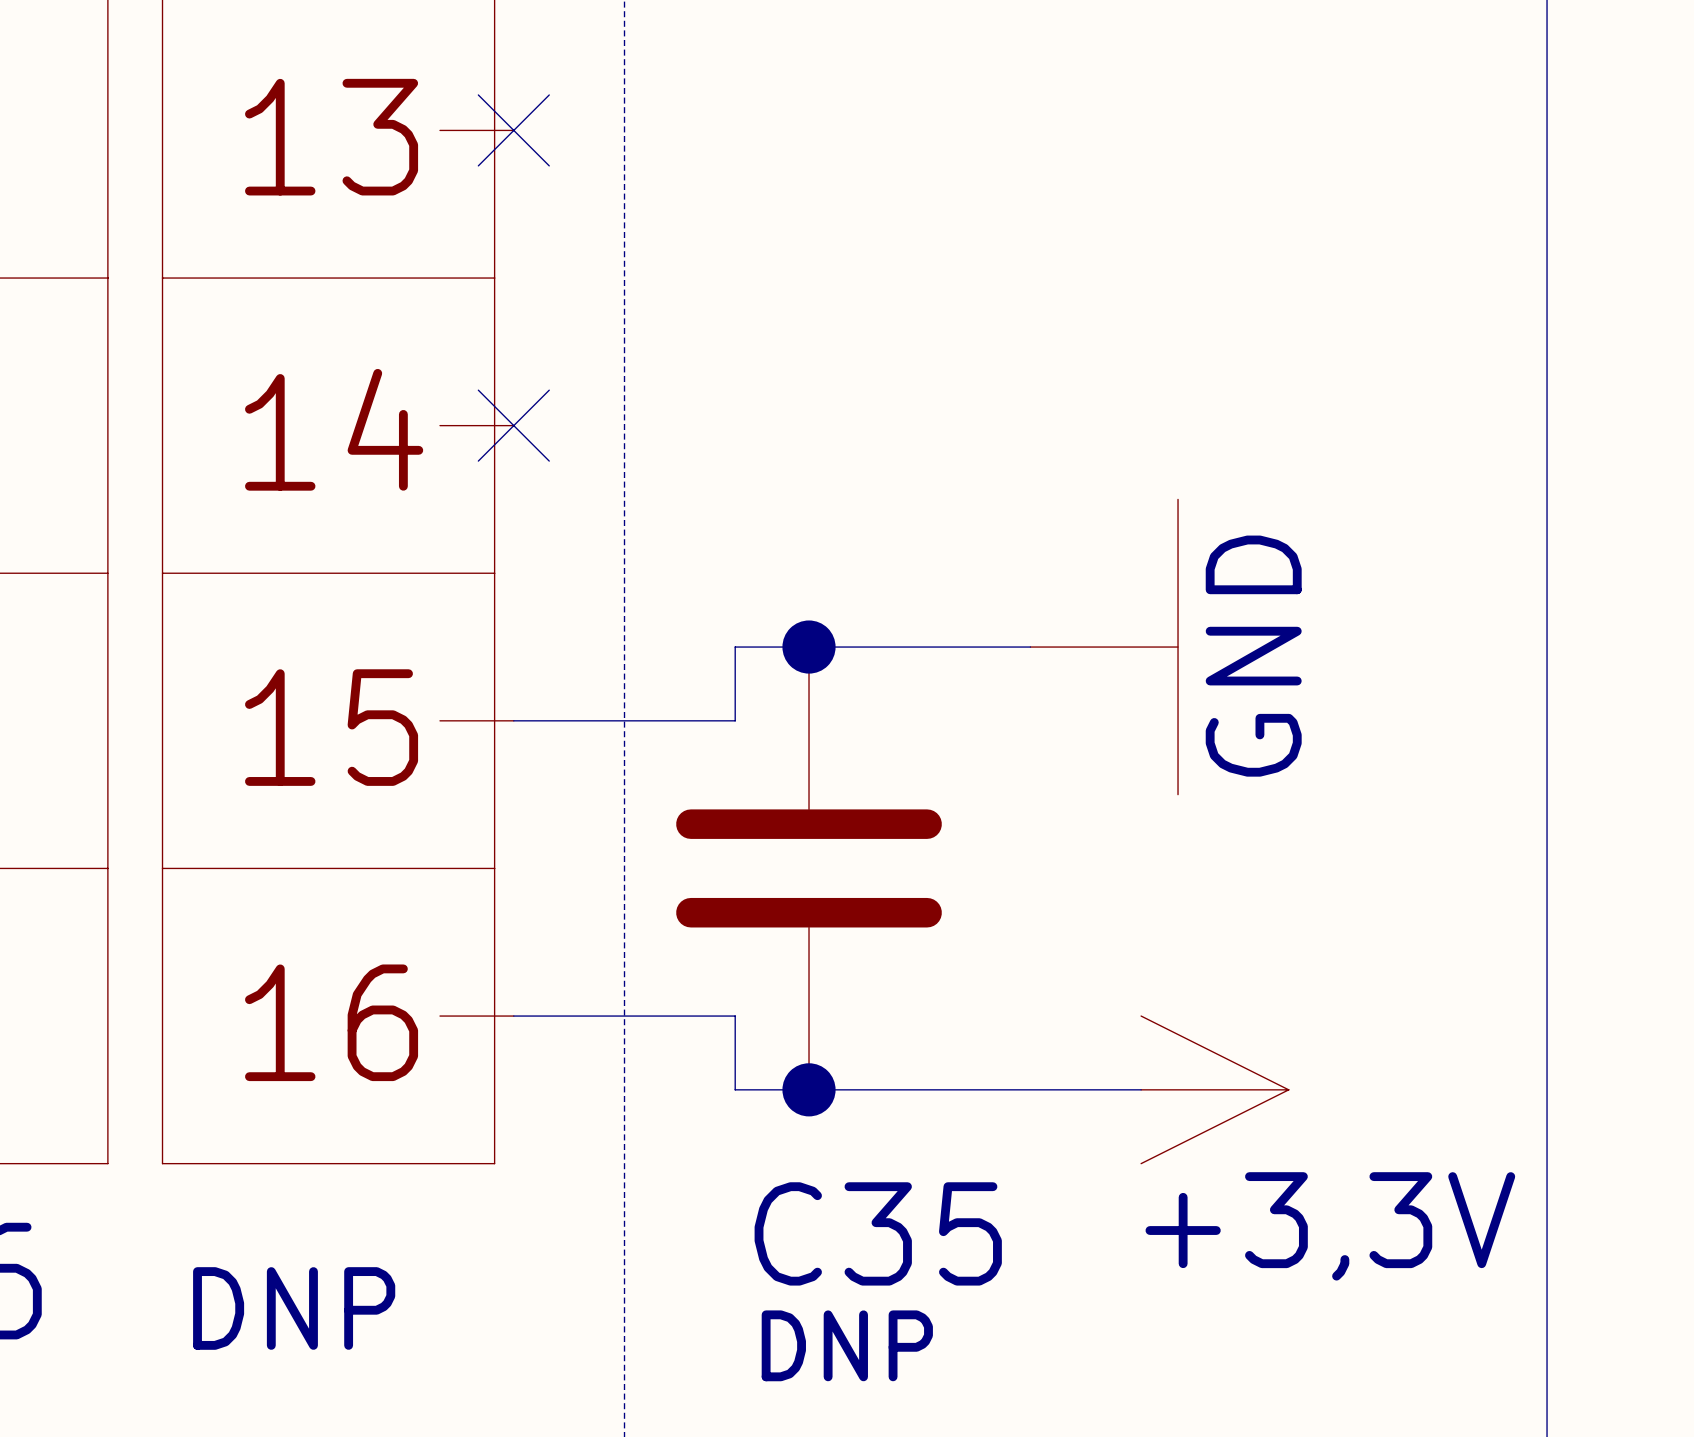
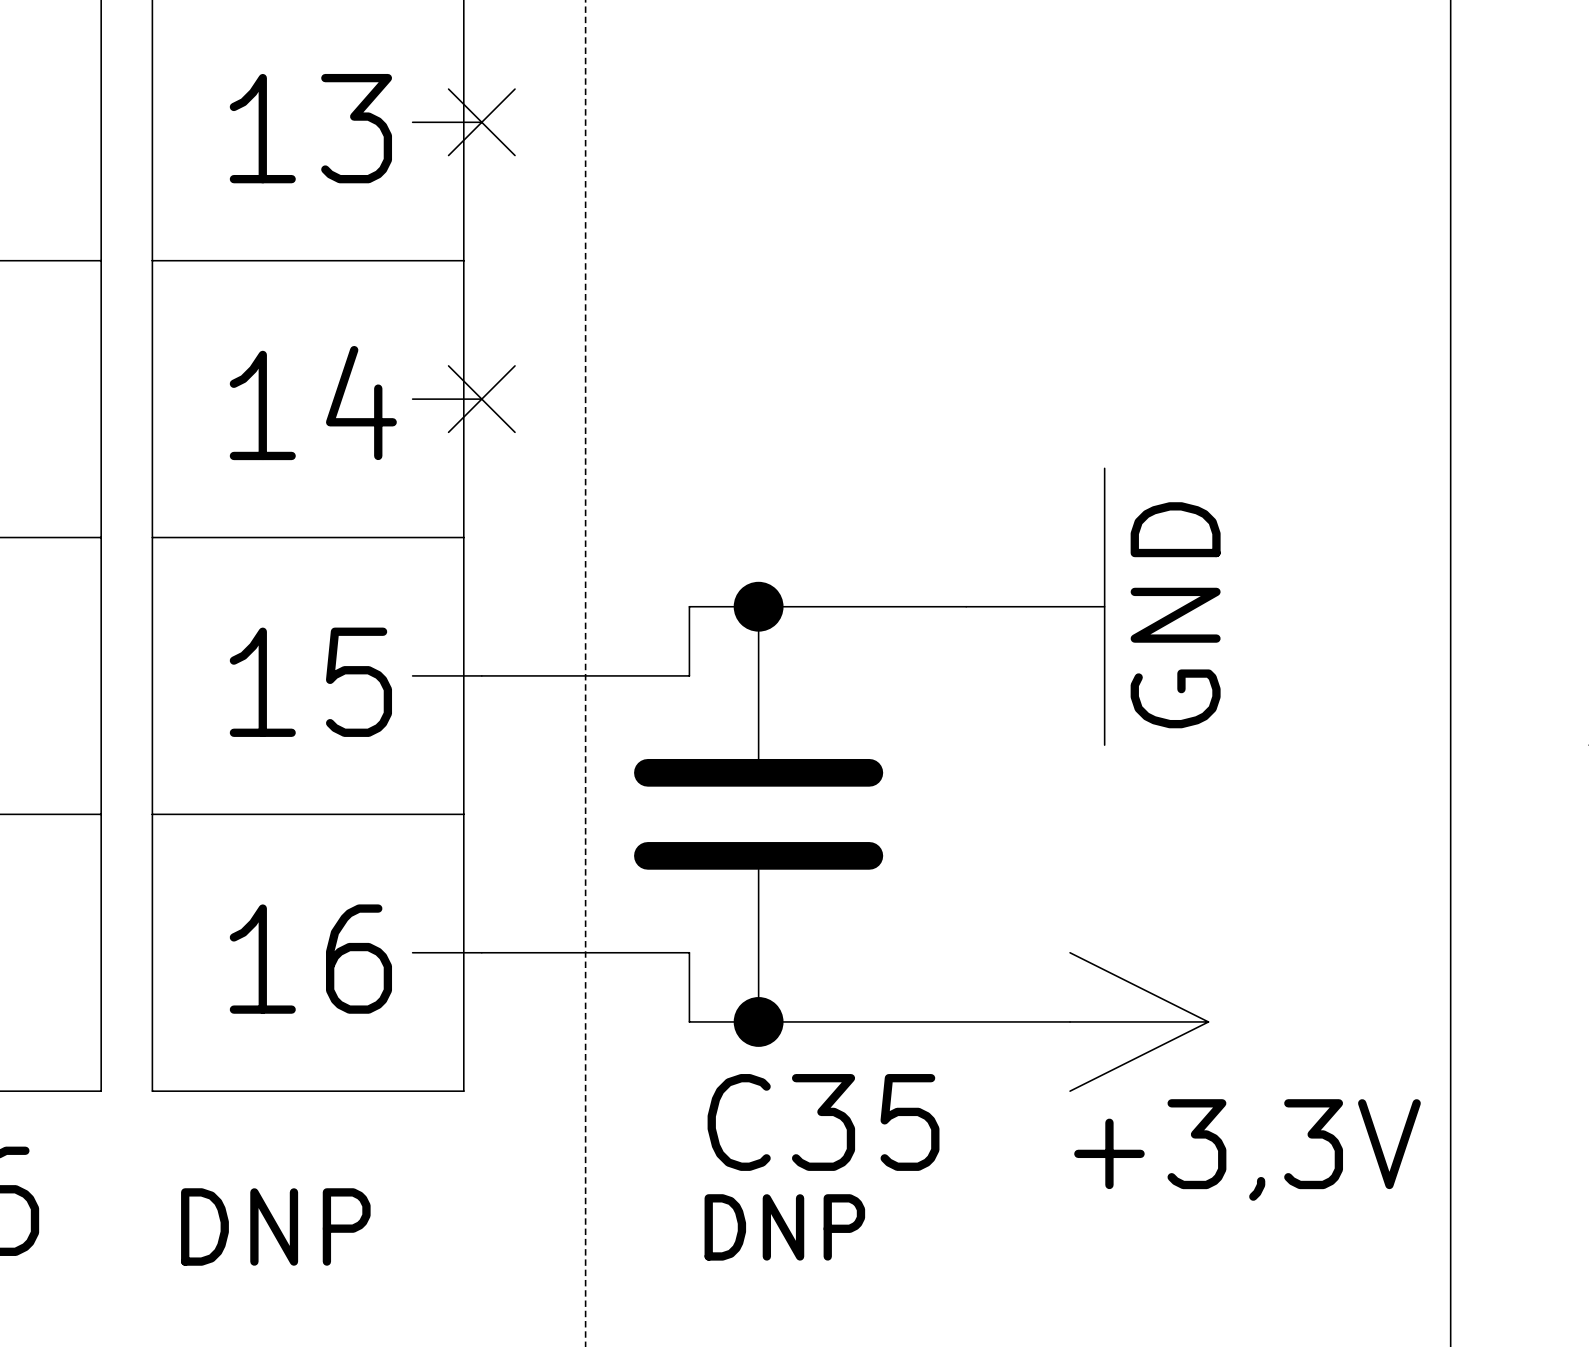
C35 name position: C35 (878, 1233) -> C35 (823, 1122)
C35 value position: DNP (847, 1345) -> DNP (784, 1227)

